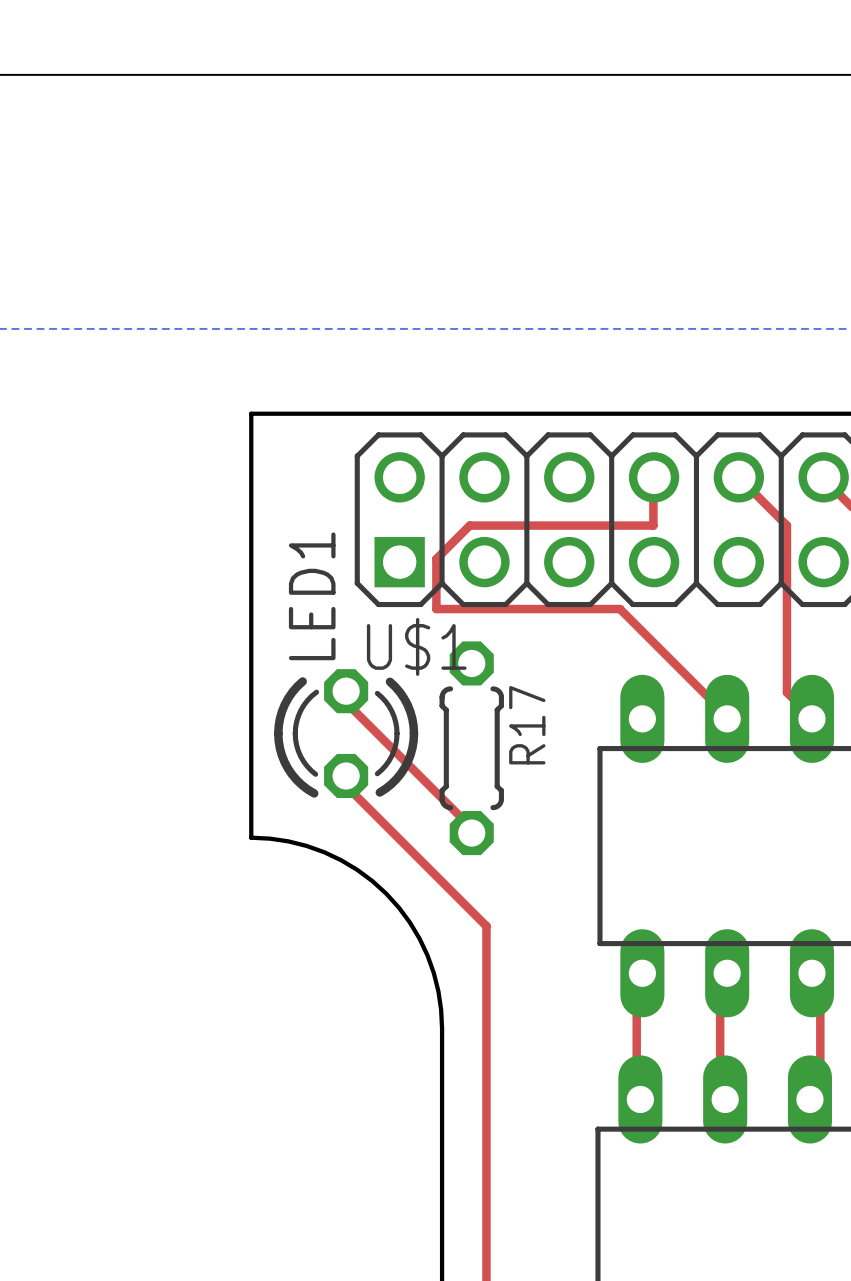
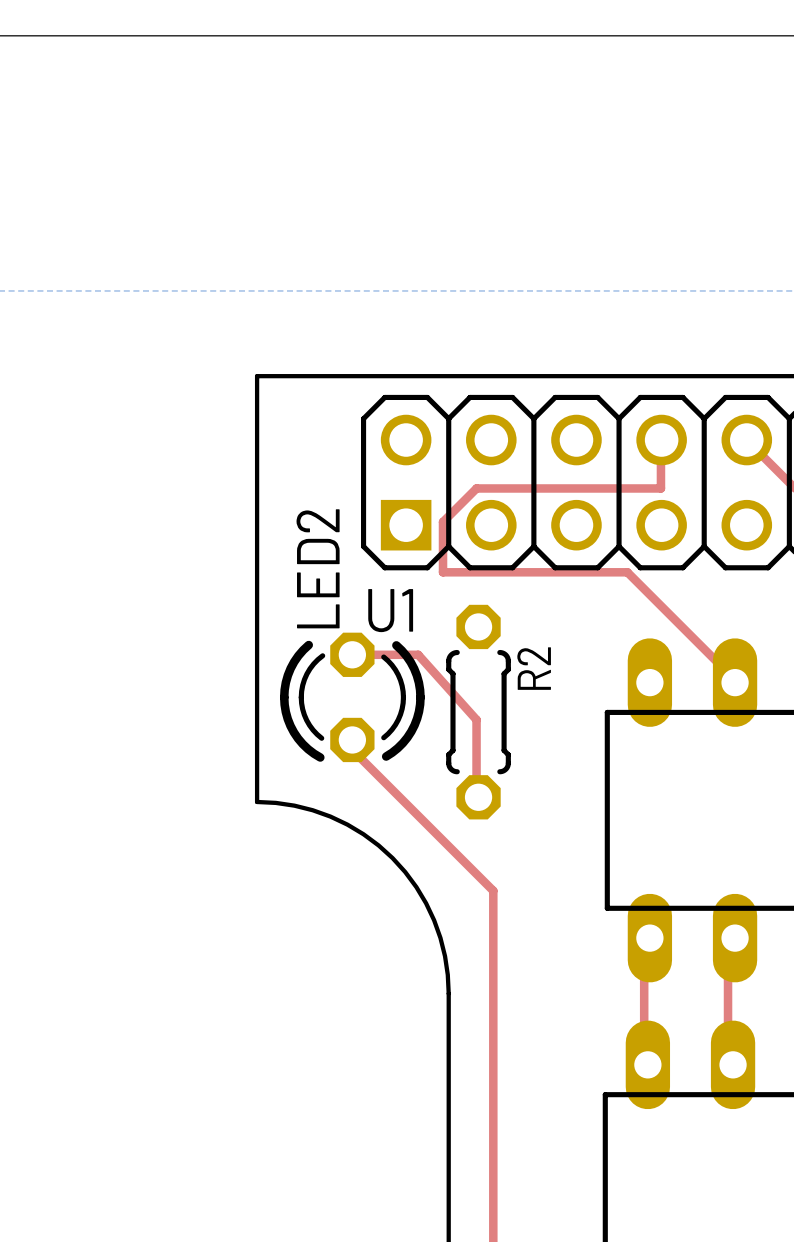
LED1 name: LED1 (312, 596) -> LED2 (318, 568)
U$1 name: U$1 (416, 646) -> U1 (390, 610)
top track: (346, 691) (352, 692) (352, 709) (469, 826) (471, 833) -> (352, 654) (418, 654) (476, 719) (476, 785) (478, 797)
R17 name: R17 (527, 725) -> R2 (534, 668)

